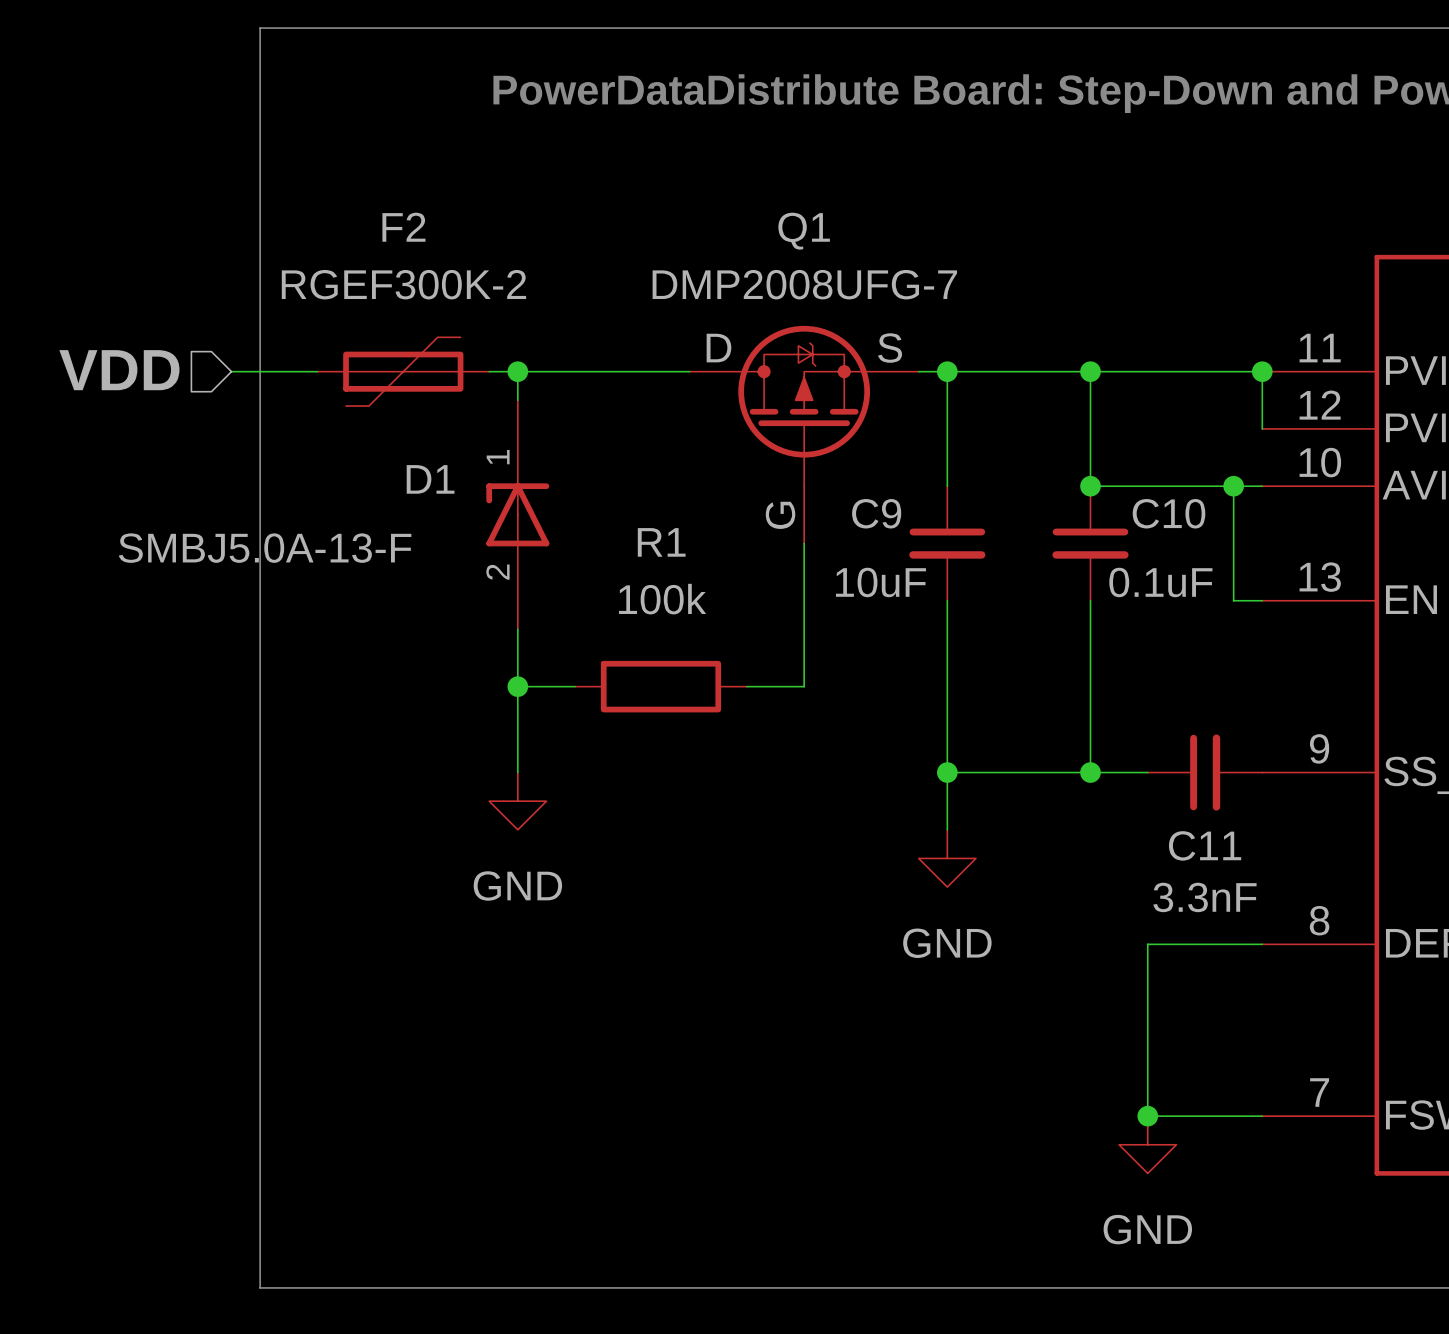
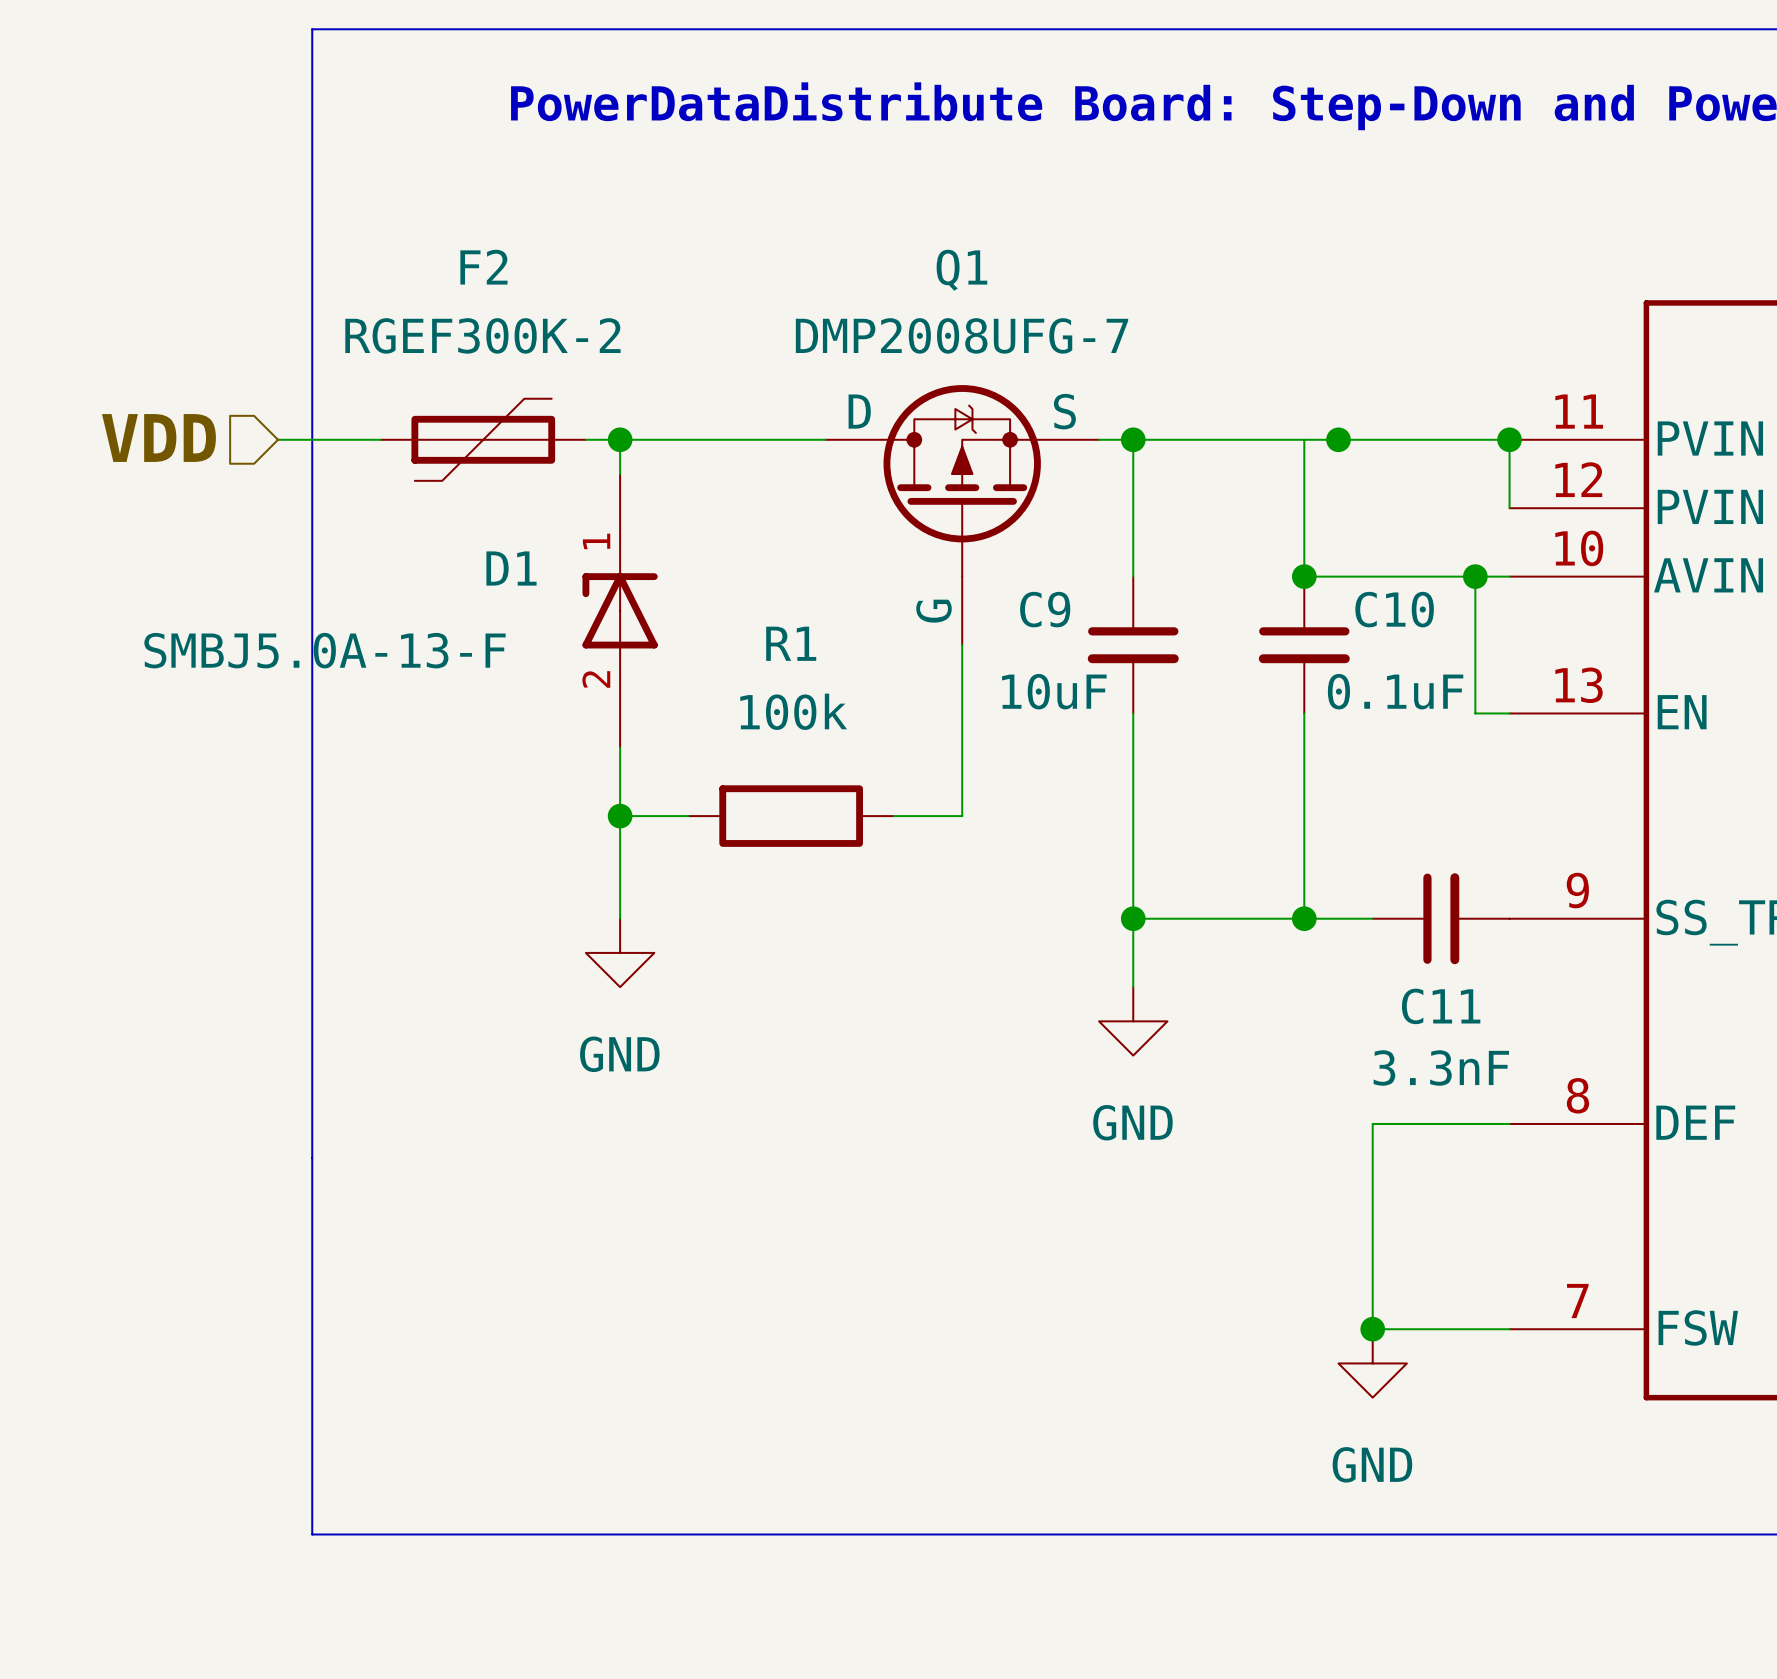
junction position: (1090, 371) -> (1338, 439)

